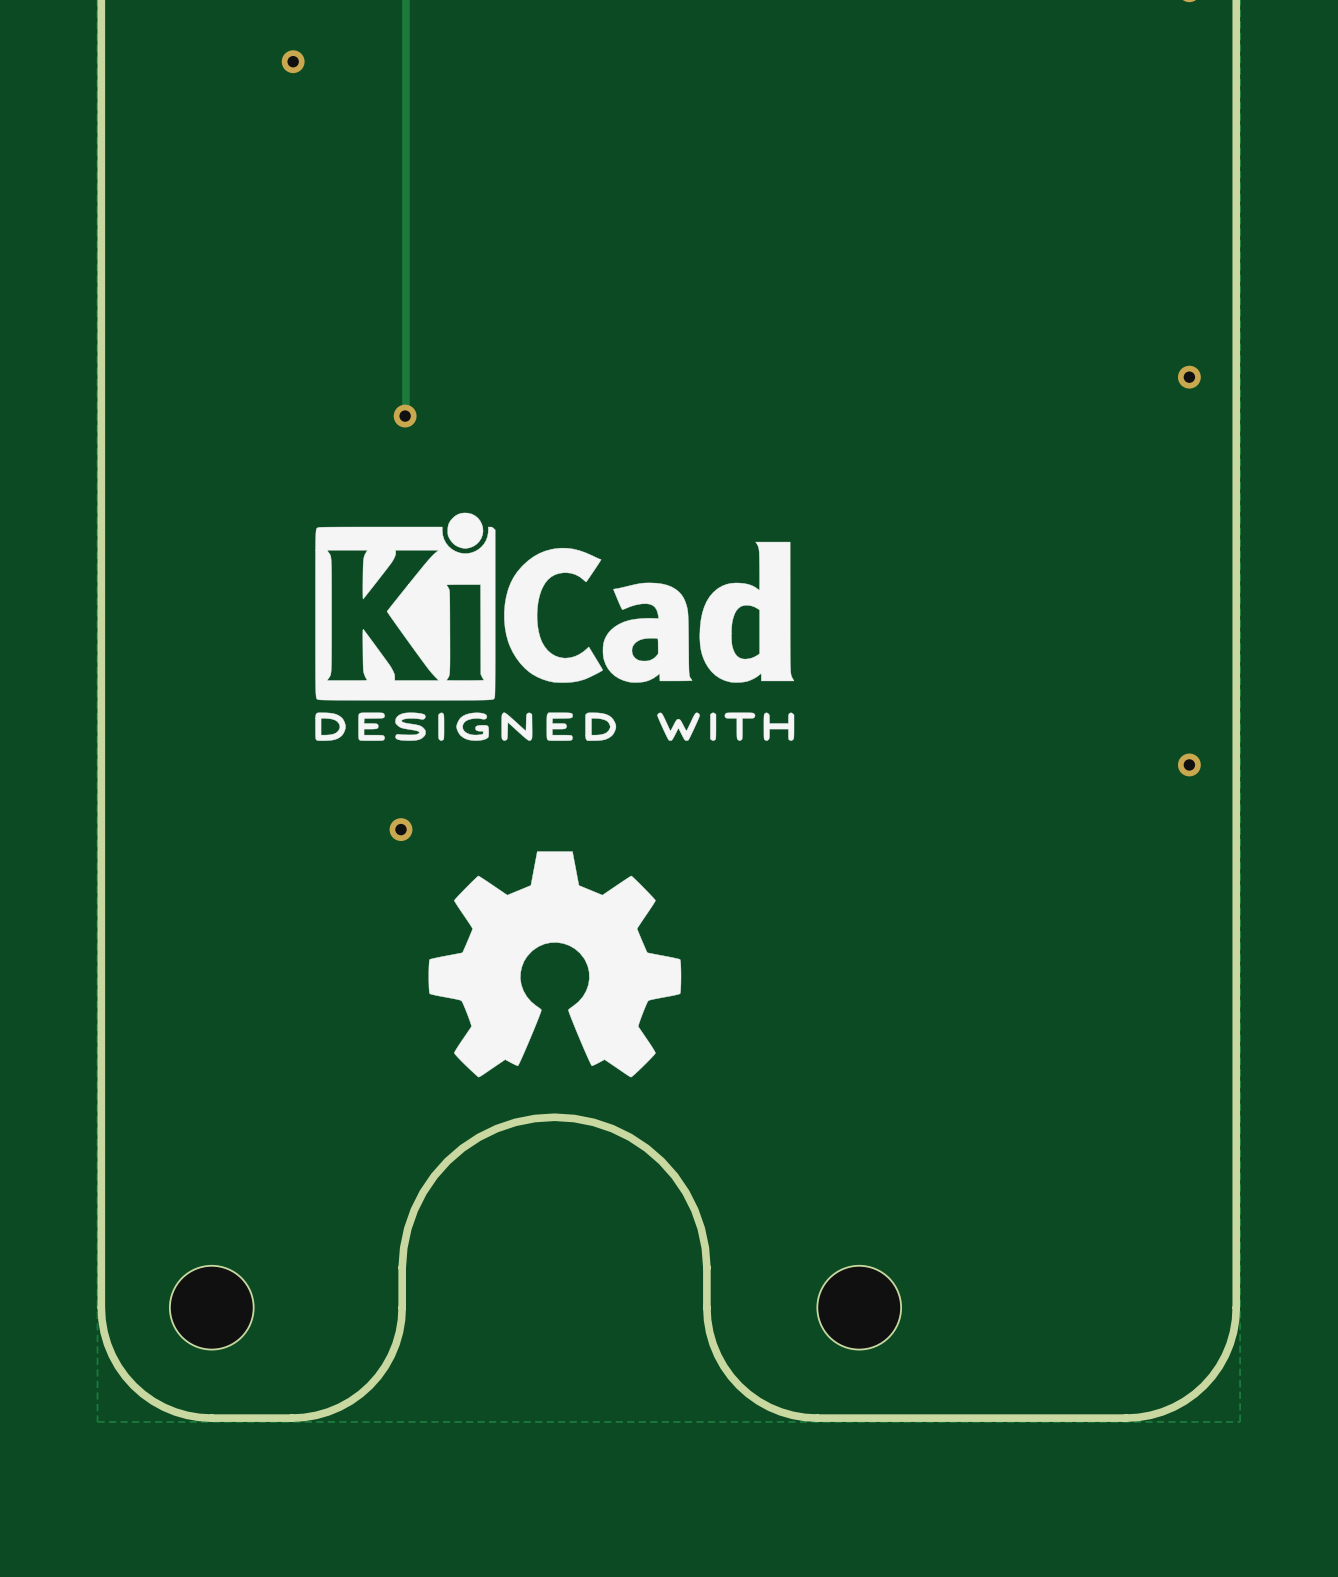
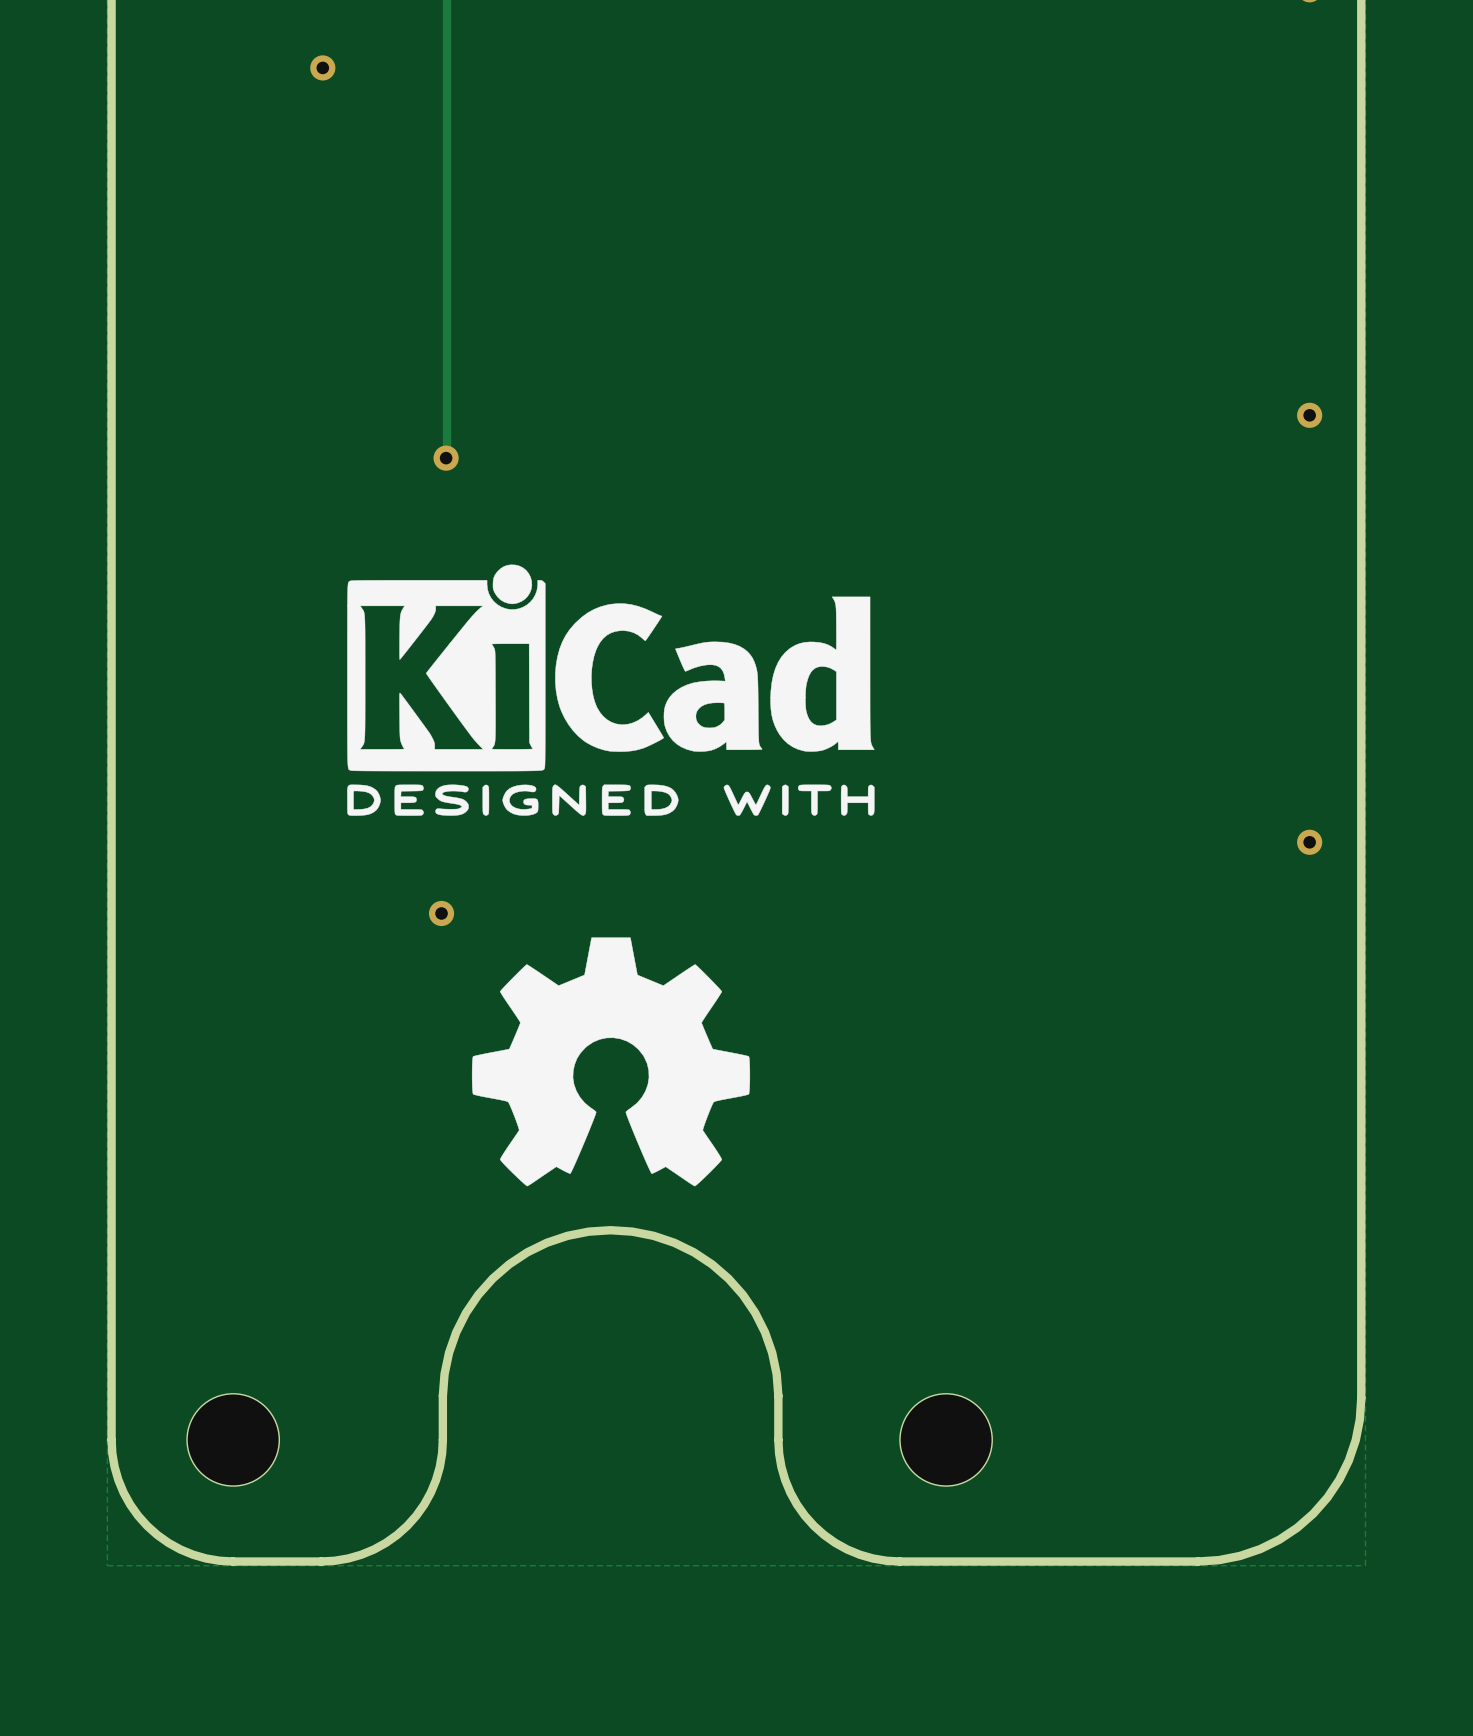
board edge: (1236, 1269) (1236, 1307) (1233, 1332) (1219, 1366) (1203, 1385) (1173, 1407) (1150, 1415) (1125, 1418) (1087, 1418) -> (1361, 1397) (1355, 1440) (1348, 1460) (1327, 1497) (1313, 1513) (1297, 1527) (1260, 1549) (1219, 1560) (1197, 1561)

